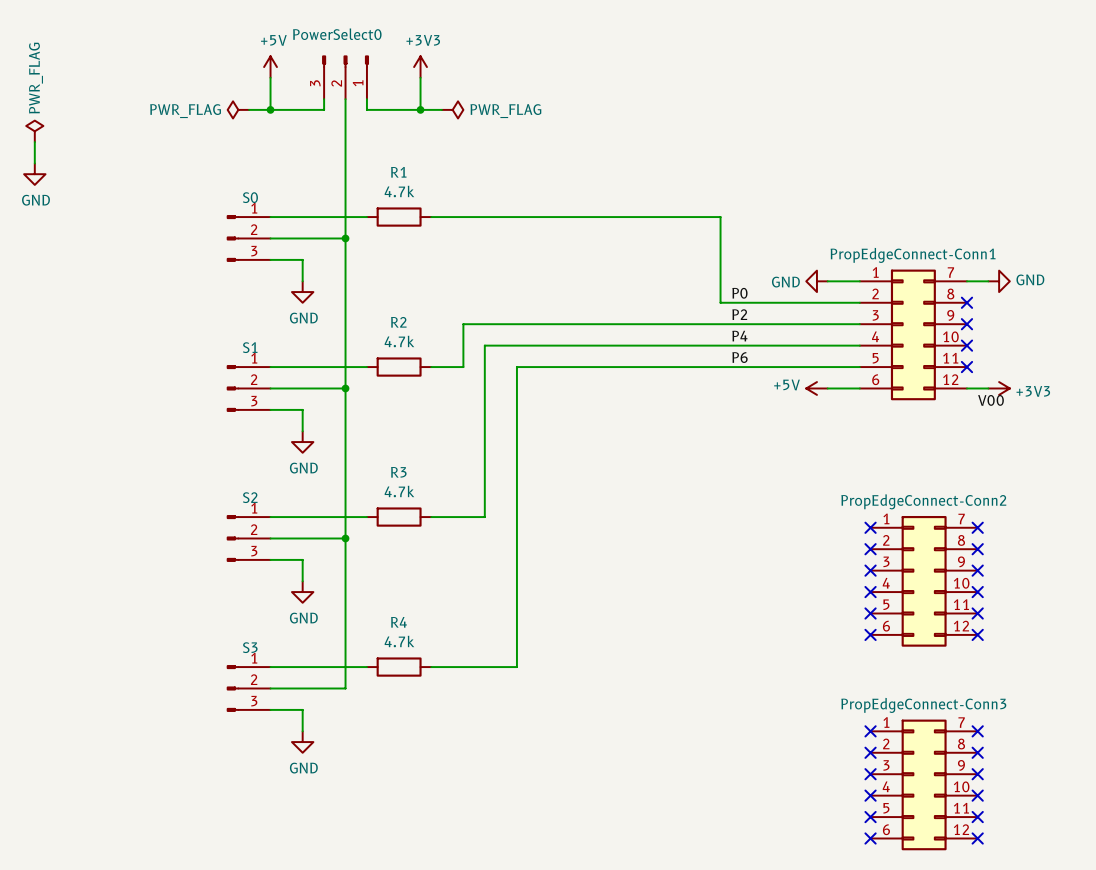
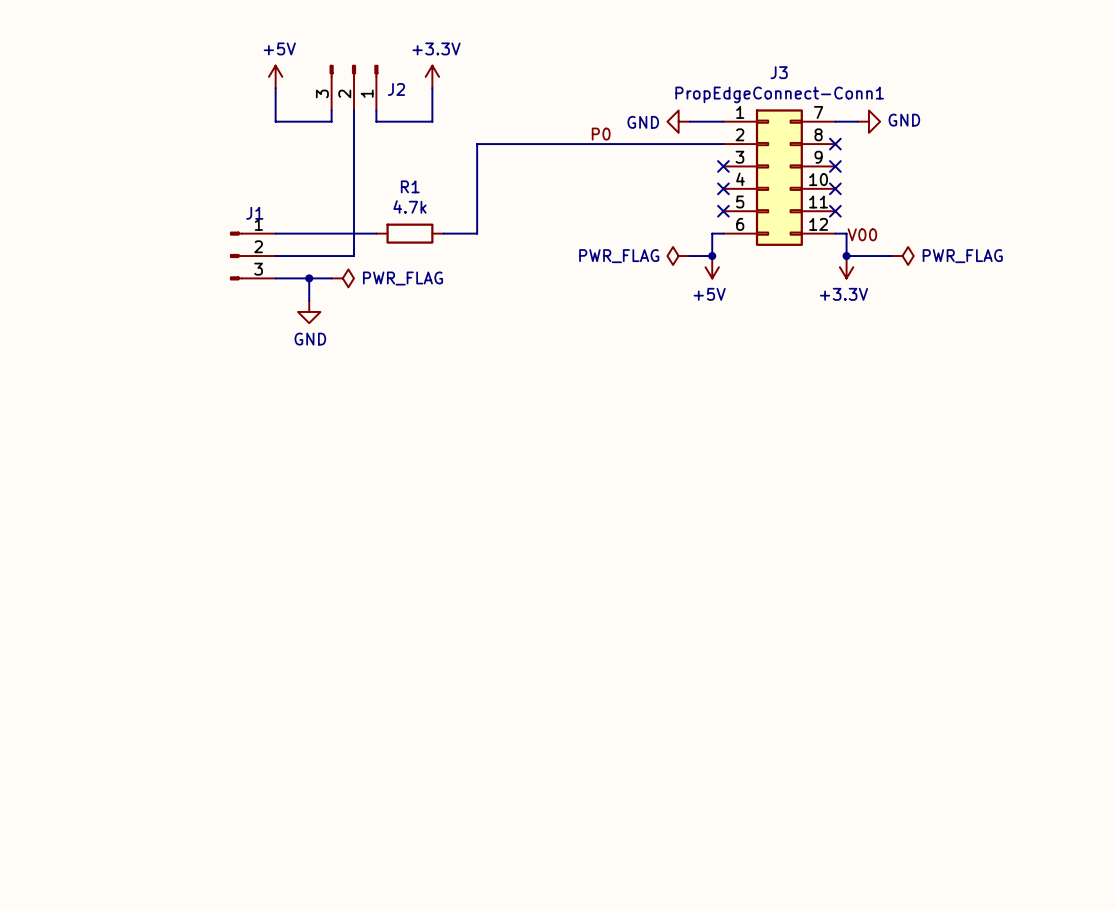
PowerSelect0 name: PowerSelect0 (337, 34) -> J2 (396, 89)
power symbol: +3V3 (420, 67) -> +3.3V (432, 76)
power symbol: PWR_FLAG (238, 109) -> none
wire: (249, 109) (270, 109) -> (309, 278) (331, 278)
junction: (270, 109) -> none
wire: (420, 109) (441, 109) -> none
junction: (420, 109) -> none
power symbol: PWR_FLAG (452, 109) -> none
power symbol: none -> GND (678, 121)
wire: none -> (689, 121) (723, 121)
wire: none -> (835, 121) (857, 121)
power symbol: none -> GND (868, 121)
label: none -> P0 (601, 134)
power symbol: PWR_FLAG (34, 131) -> none
no-connect mark: none -> (835, 144)
wire: (34, 142) (34, 163) -> none
no-connect mark: none -> (723, 166)
no-connect mark: none -> (835, 166)
J3: none -> PropEdgeConnect-Conn1 (779, 177)
power symbol: GND (34, 174) -> none
no-connect mark: none -> (723, 188)
no-connect mark: none -> (835, 188)
no-connect mark: none -> (723, 211)
no-connect mark: none -> (835, 211)
S0 name: S0 (250, 197) -> J1 (254, 213)
wire: (463, 217) (688, 217) -> (477, 233) (477, 144) (723, 144)
wire: none -> (712, 233) (712, 256) (689, 256)
wire: (699, 217) (720, 217) (720, 302) (859, 302) -> none
wire: none -> (835, 233) (846, 233) (846, 256) (891, 256)
label: none -> V00 (862, 234)
wire: (345, 238) (345, 688) (270, 688) -> none
junction position: (345, 238) -> (309, 278)
power symbol: none -> PWR_FLAG (678, 256)
junction: none -> (712, 256)
junction: none -> (846, 256)
power symbol: none -> PWR_FLAG (902, 256)
power symbol: none -> +3.3V (846, 267)
power symbol: none -> PWR_FLAG (342, 278)
power symbol: GND (816, 281) -> none
wire: (827, 281) (859, 281) -> none
wire: (966, 281) (988, 281) -> none
power symbol: GND (999, 281) -> none
label: P0 (739, 293) -> none
no-connect mark: (966, 302) -> none
label: P2 (739, 314) -> none
wire: (859, 324) (463, 324) (463, 367) (431, 367) -> none
no-connect mark: (966, 324) -> none
part: PropEdgeConnect-Conn1 (913, 334) -> none
label: P4 (739, 336) -> none
wire: (859, 345) (484, 345) (484, 517) (431, 517) -> none
no-connect mark: (966, 345) -> none
label: P6 (740, 357) -> none
wire: (270, 367) (366, 367) -> none
R2: 4.7k (399, 367) -> none
wire: (859, 367) (516, 367) (516, 667) (431, 667) -> none
no-connect mark: (966, 367) -> none
S1: (248, 388) -> none
wire: (270, 388) (345, 388) -> none
junction: (345, 388) -> none
power symbol rotation: 0° (816, 388) -> 90° counterclockwise (712, 267)
power symbol position: +5V (816, 388) -> +5V (712, 267)
wire: (827, 388) (859, 388) -> none
wire: (966, 388) (988, 388) -> none
power symbol: +3V3 (999, 388) -> none
label: V00 (991, 400) -> none
wire: (270, 409) (302, 409) (302, 431) -> none
power symbol: GND (302, 442) -> none
wire: (270, 517) (366, 517) -> none
R3: 4.7k (399, 517) -> none
no-connect mark: (870, 527) -> none
no-connect mark: (977, 527) -> none
S2: (248, 538) -> none
wire: (270, 538) (345, 538) -> none
junction: (345, 538) -> none
no-connect mark: (870, 549) -> none
no-connect mark: (977, 549) -> none
wire: (270, 559) (302, 559) (302, 581) -> none
no-connect mark: (870, 570) -> none
no-connect mark: (977, 570) -> none
part: PropEdgeConnect-Conn2 (924, 581) -> none
power symbol: GND (302, 592) -> none
no-connect mark: (870, 592) -> none
no-connect mark: (977, 592) -> none
no-connect mark: (870, 613) -> none
no-connect mark: (977, 613) -> none
no-connect mark: (870, 634) -> none
no-connect mark: (977, 634) -> none
wire: (270, 667) (366, 667) -> none
R4: 4.7k (399, 667) -> none
S3: (248, 688) -> none
wire: (270, 709) (302, 709) (302, 731) -> none
no-connect mark: (870, 731) -> none
no-connect mark: (977, 731) -> none
power symbol: GND (302, 742) -> none
no-connect mark: (870, 752) -> none
no-connect mark: (977, 752) -> none
no-connect mark: (870, 774) -> none
no-connect mark: (977, 774) -> none
part: PropEdgeConnect-Conn3 (924, 784) -> none
no-connect mark: (870, 795) -> none
no-connect mark: (977, 795) -> none
no-connect mark: (870, 817) -> none
no-connect mark: (977, 817) -> none
no-connect mark: (870, 838) -> none
no-connect mark: (977, 838) -> none

